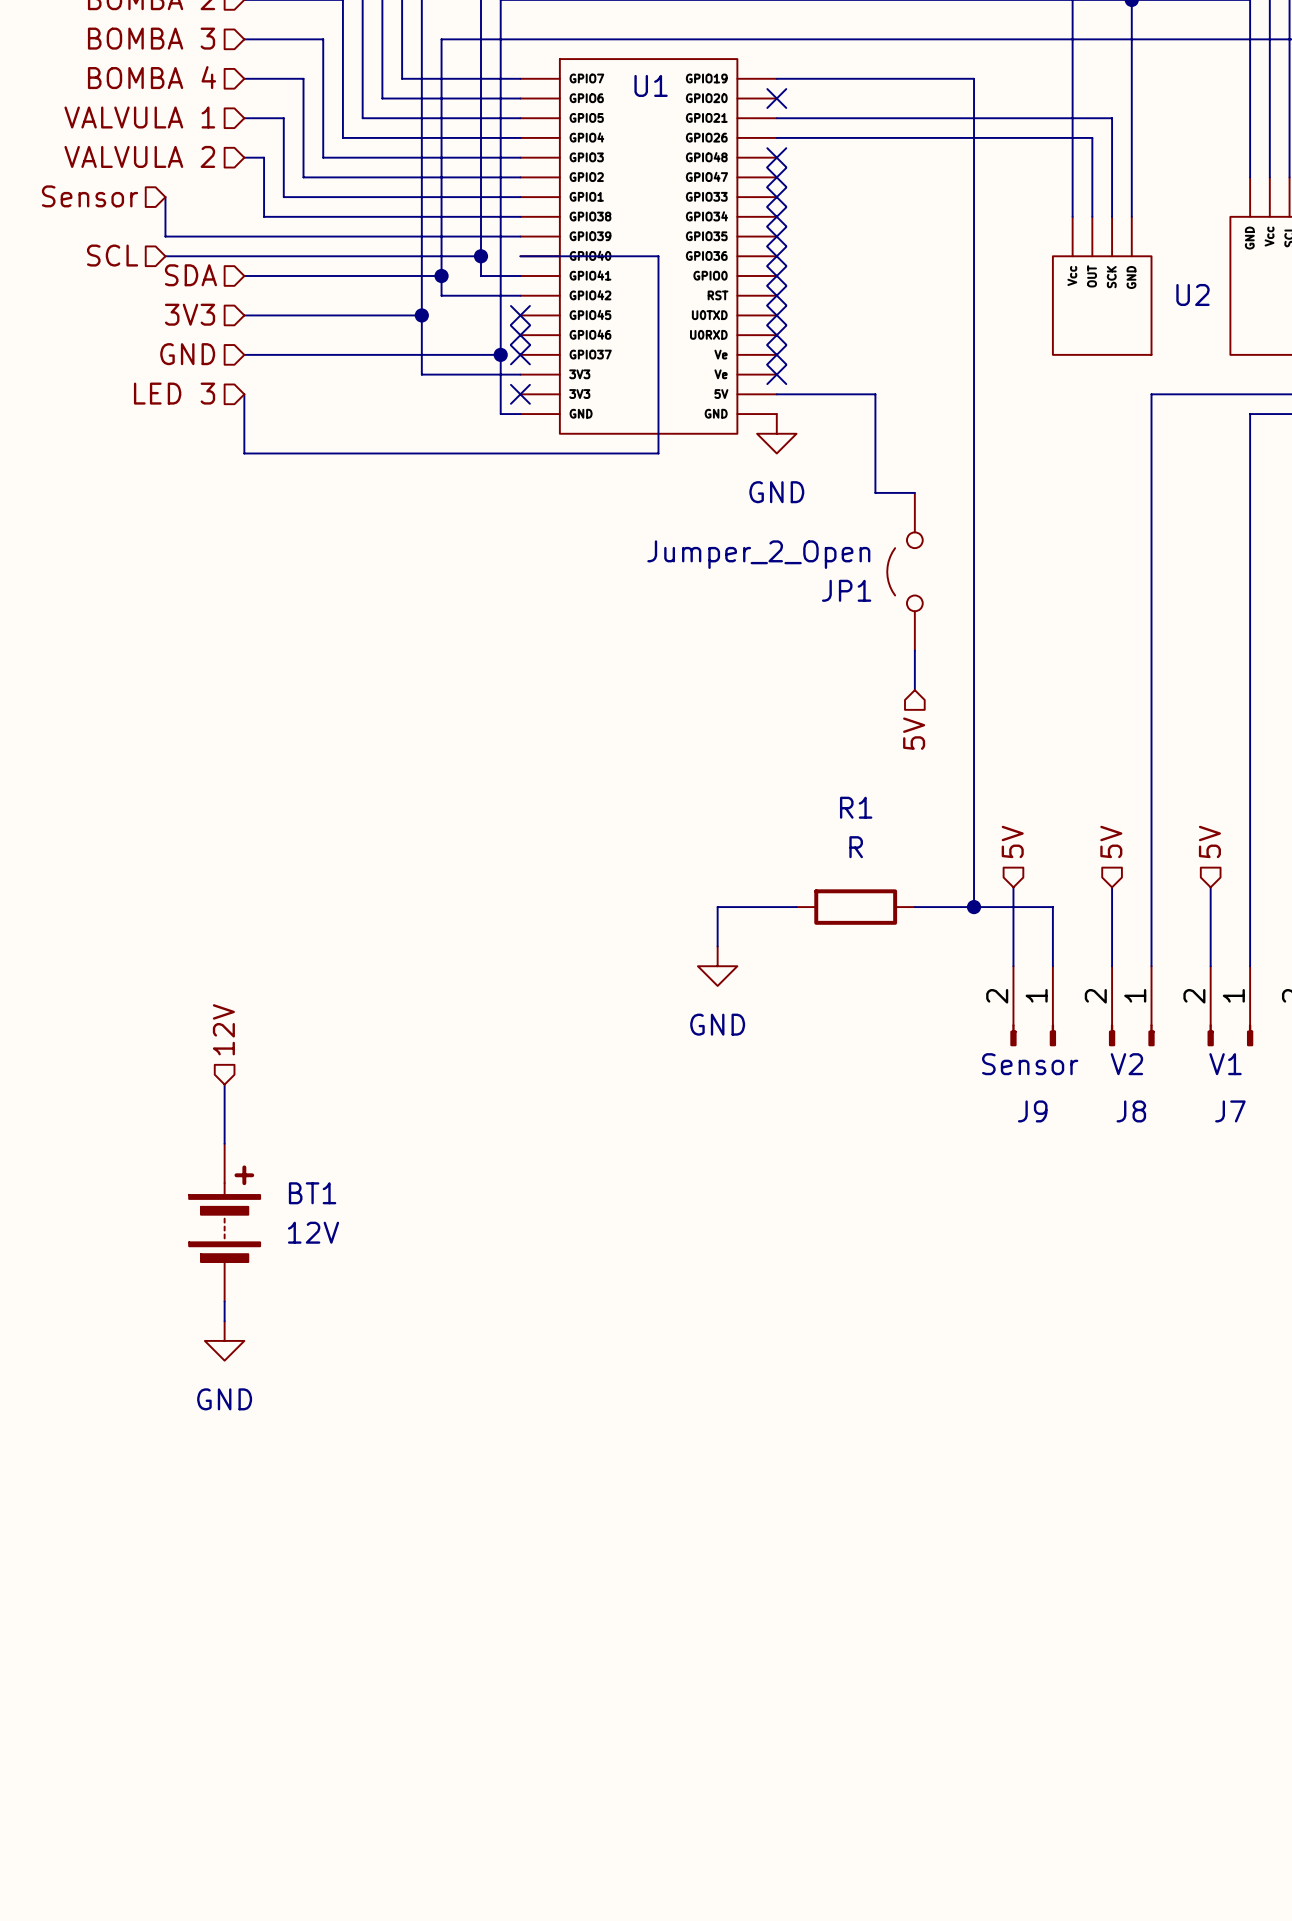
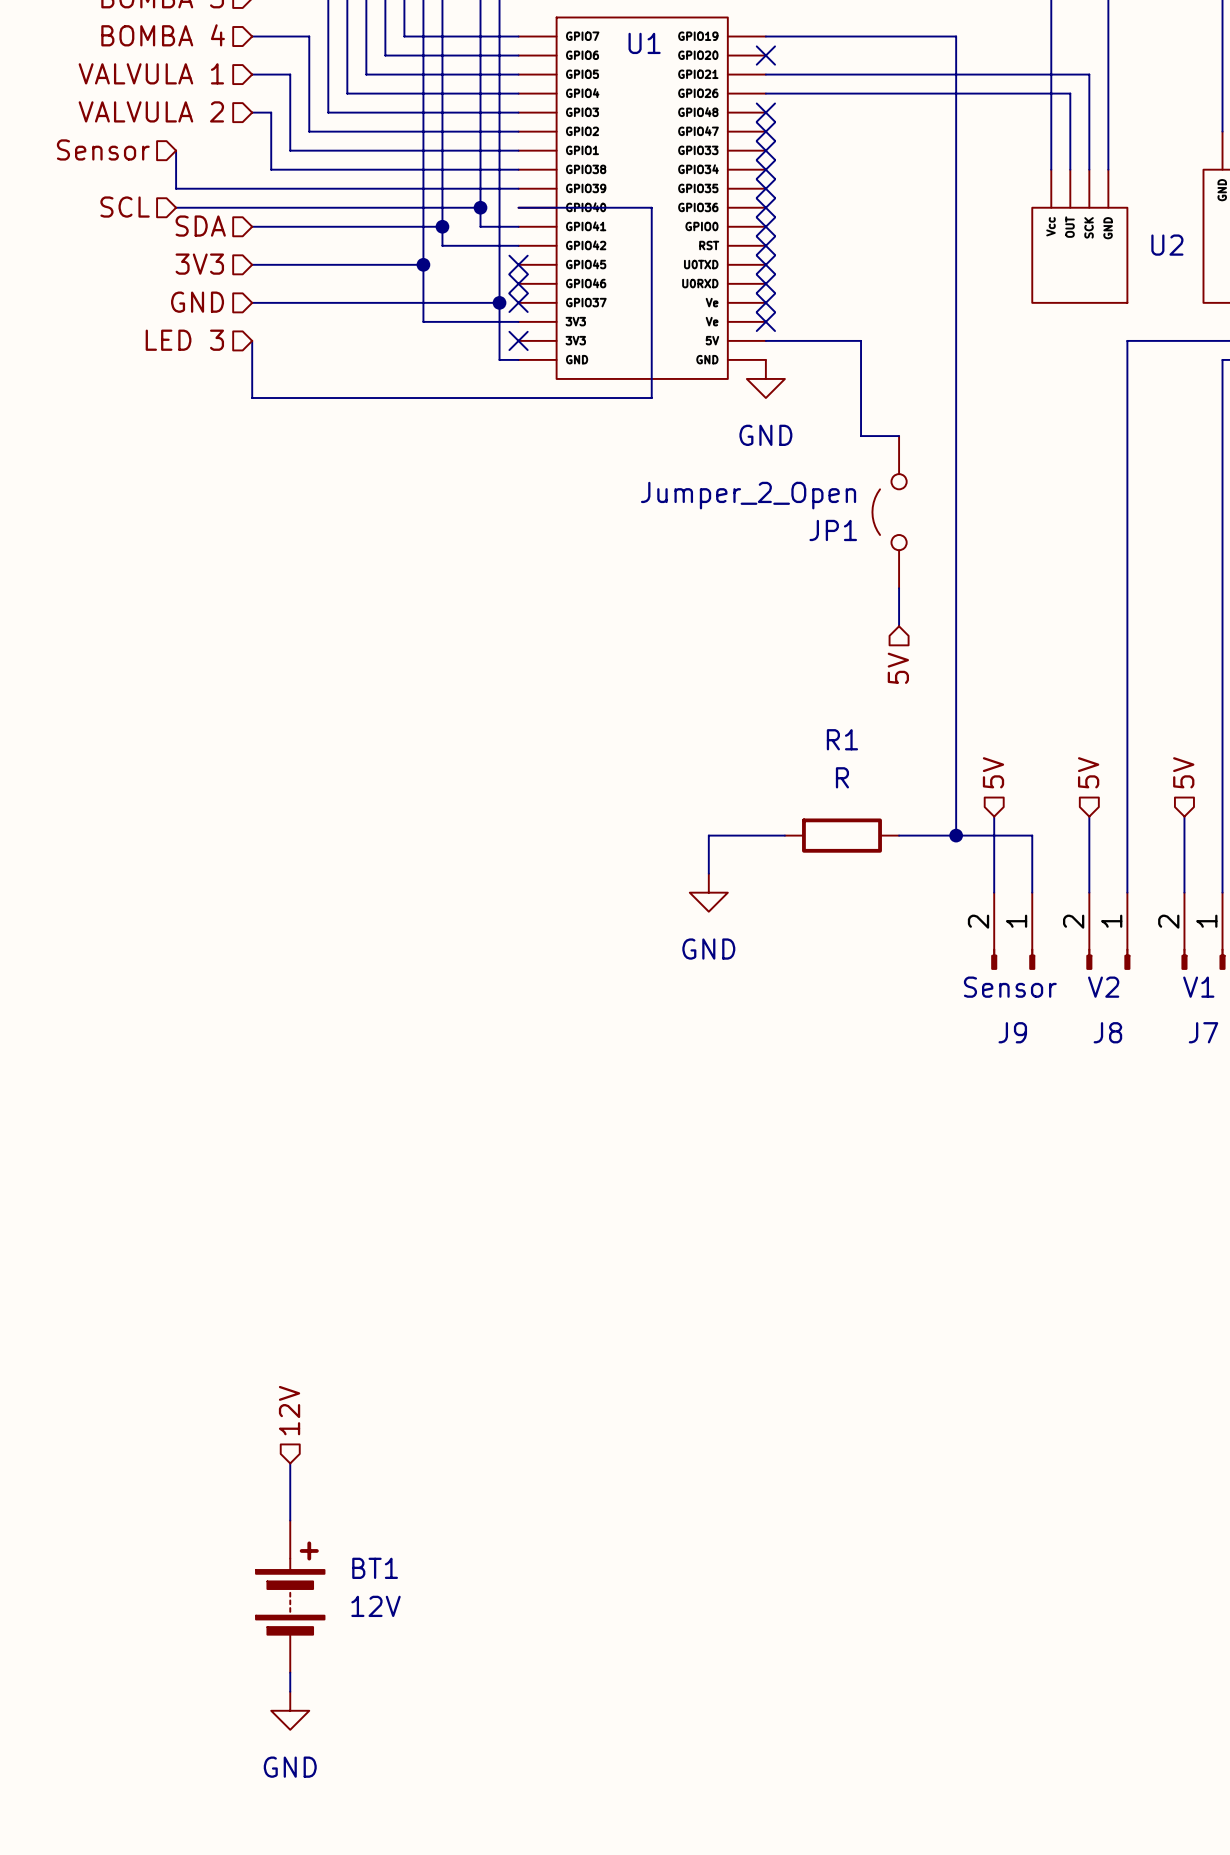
hierarchical label: 12V (223, 1029) -> none
wire: (224, 1084) (224, 1143) -> none
BT1 position: (224, 1222) -> (290, 1596)
wire: (224, 1301) (224, 1321) -> none
power symbol: GND (224, 1340) -> none
hierarchical label: none -> 12V (289, 1410)
wire: none -> (290, 1463) (290, 1520)
wire: none -> (290, 1672) (290, 1691)
power symbol: none -> GND (290, 1710)

